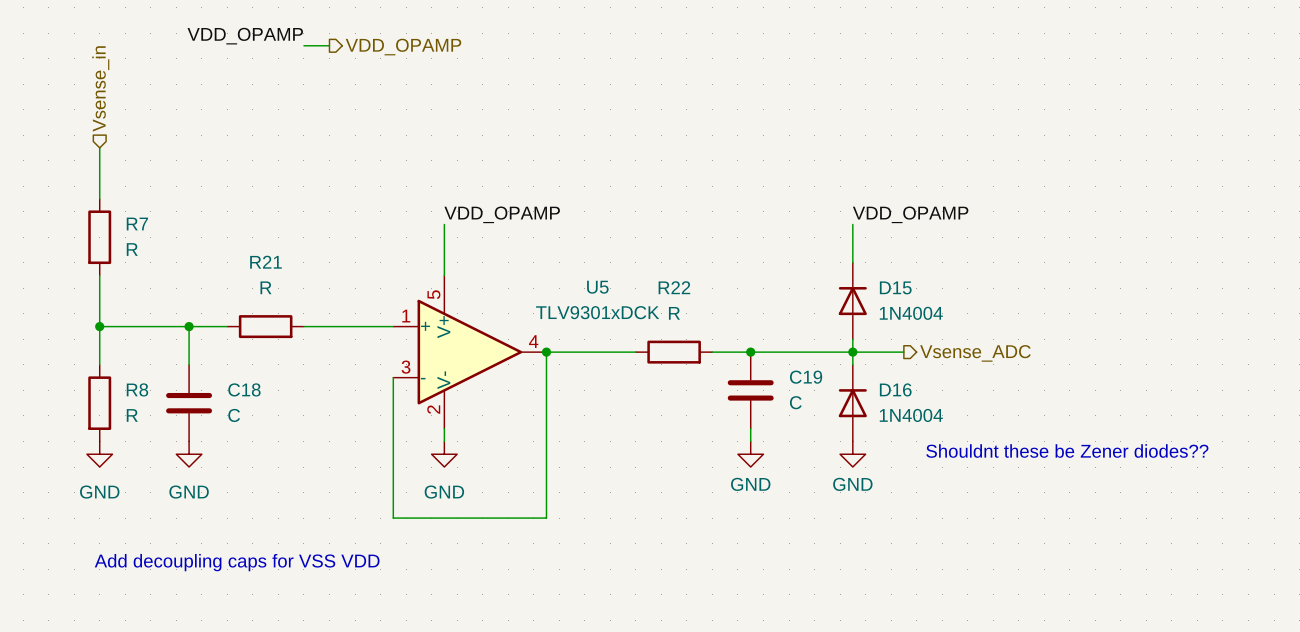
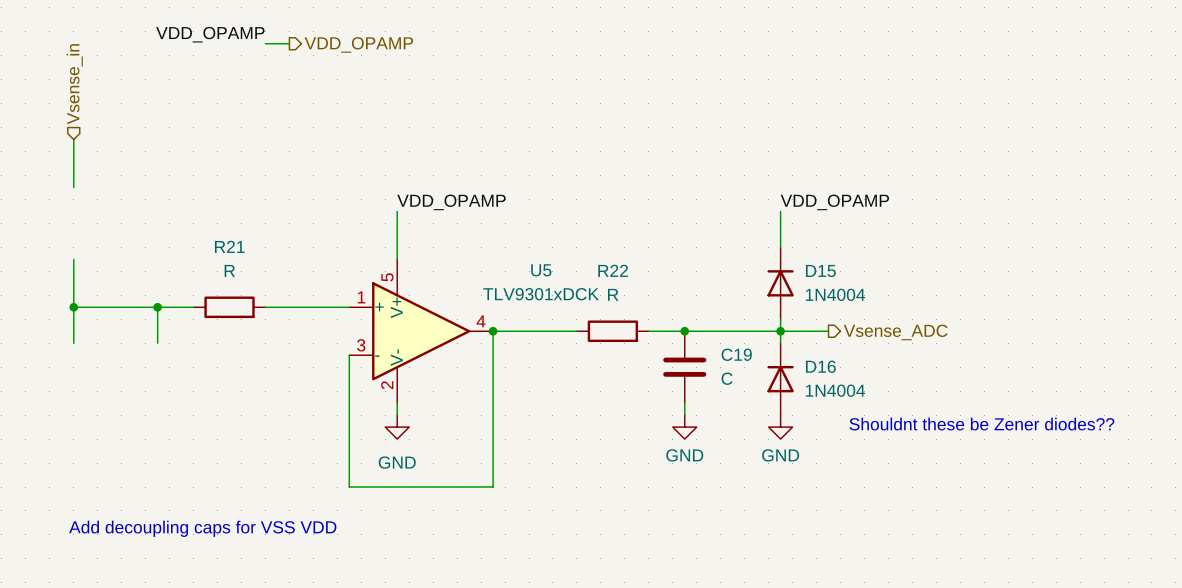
R7: R (99, 237) -> none
R8: R (99, 403) -> none
C18: C (189, 403) -> none
power symbol: GND (99, 454) -> none
power symbol: GND (189, 454) -> none

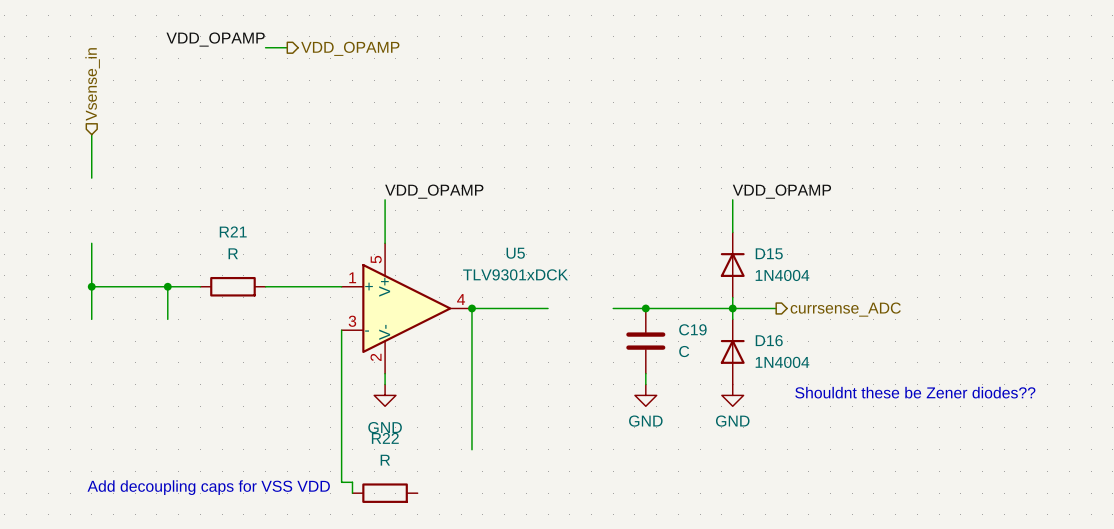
R22 position: (612, 331) -> (385, 493)
hierarchical label: Vsense_ADC (895, 332) -> currsense_ADC (845, 309)
wire: (349, 487) (493, 487) -> (341, 449) (341, 482) (352, 482) (352, 493)

